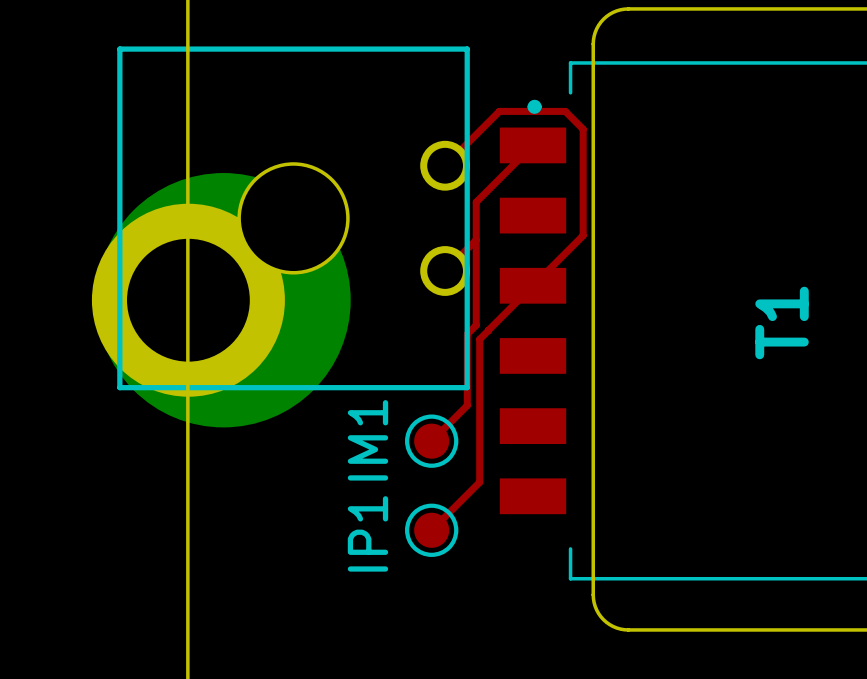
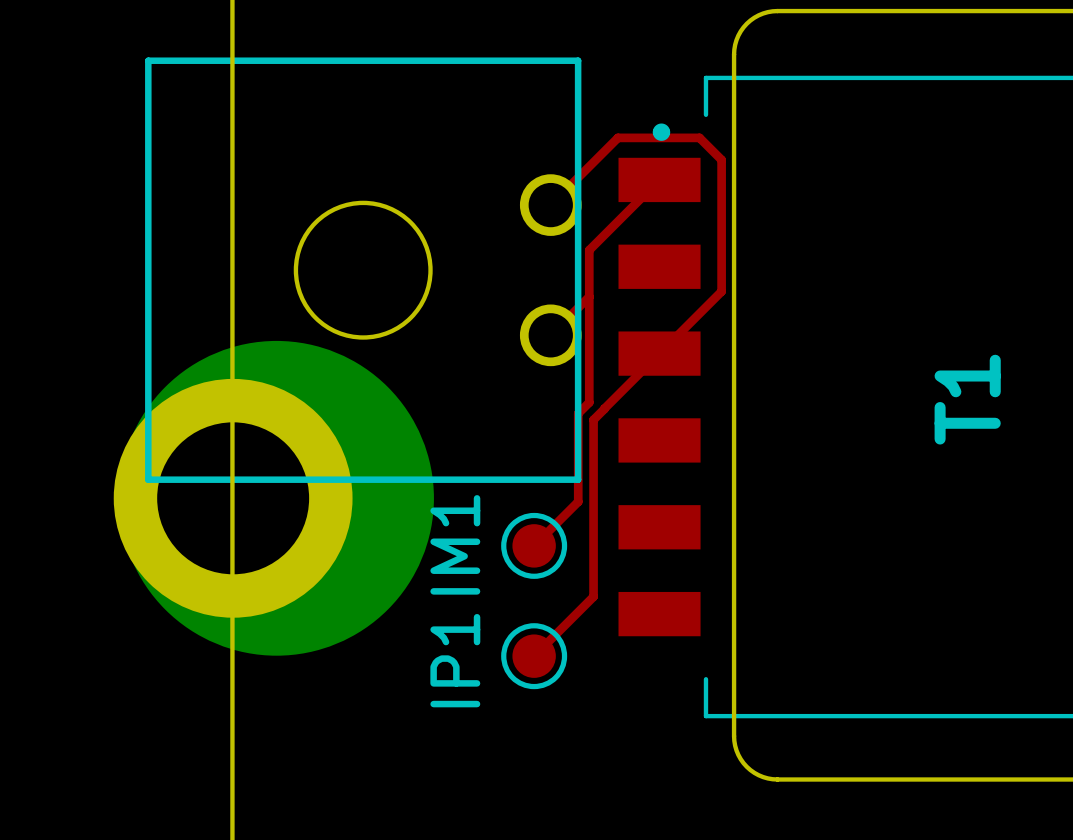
part position: (221, 300) -> (273, 498)

